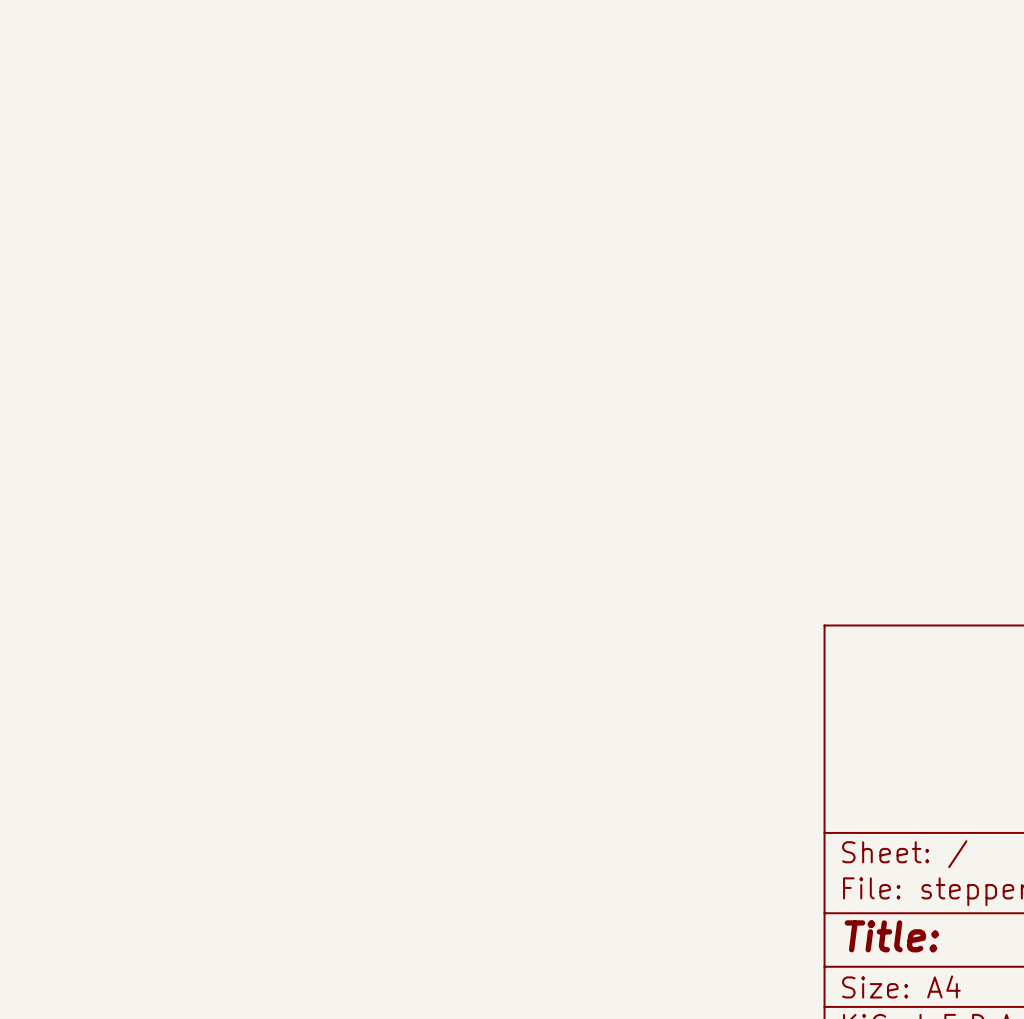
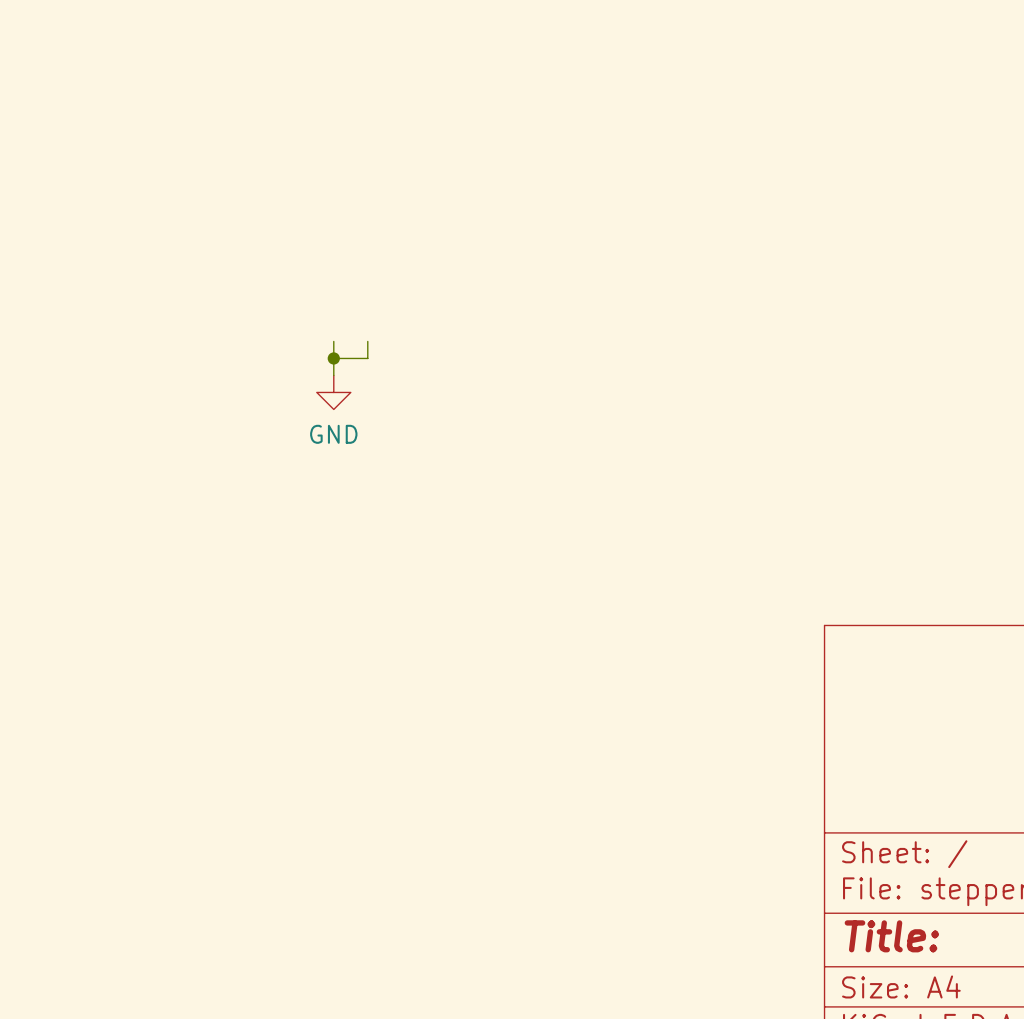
wire: none -> (333, 341) (333, 375)
wire: none -> (367, 341) (367, 358) (333, 358)
junction: none -> (333, 358)
power symbol: none -> GND (333, 392)

